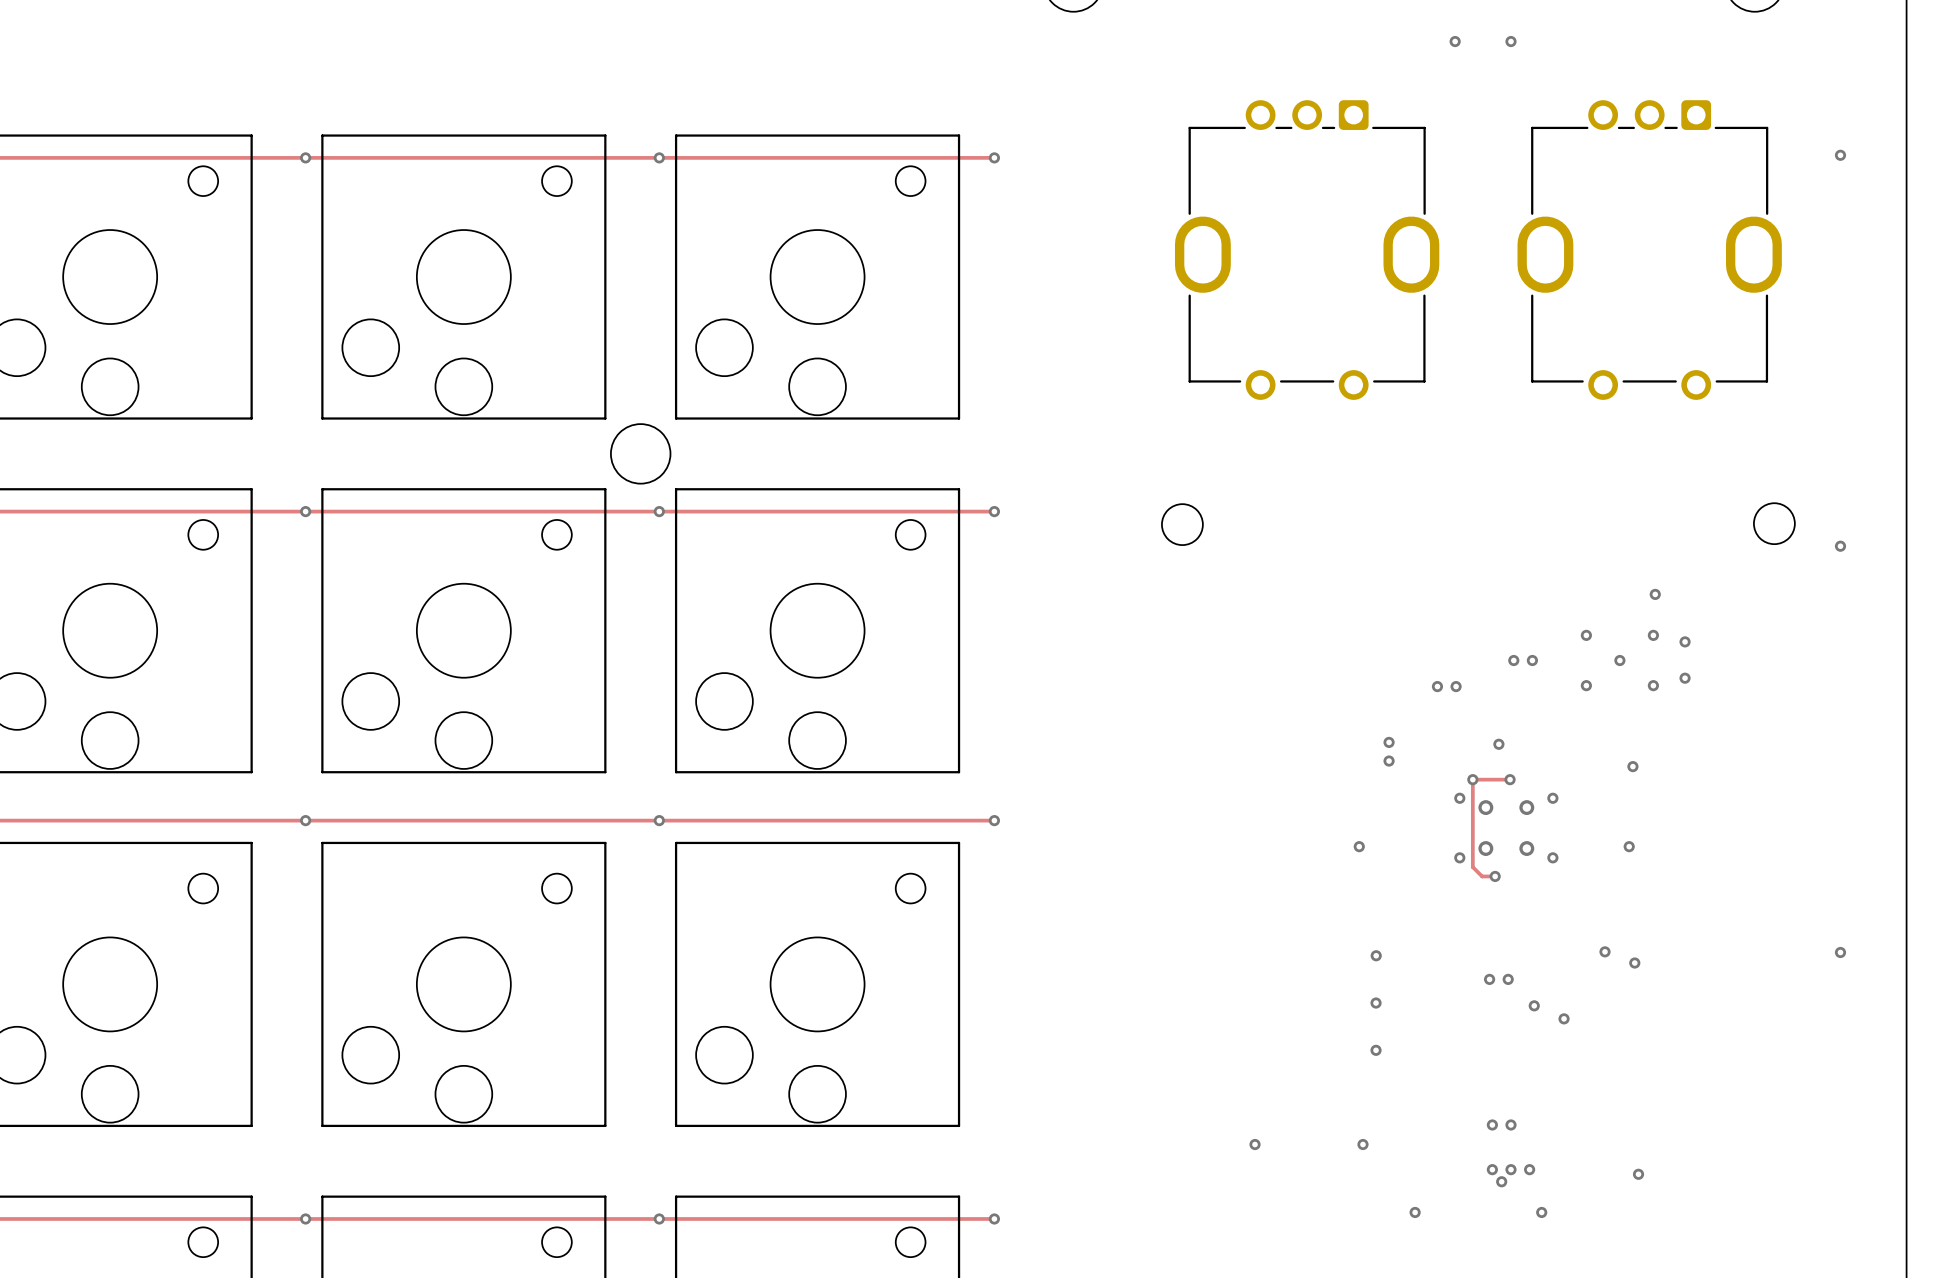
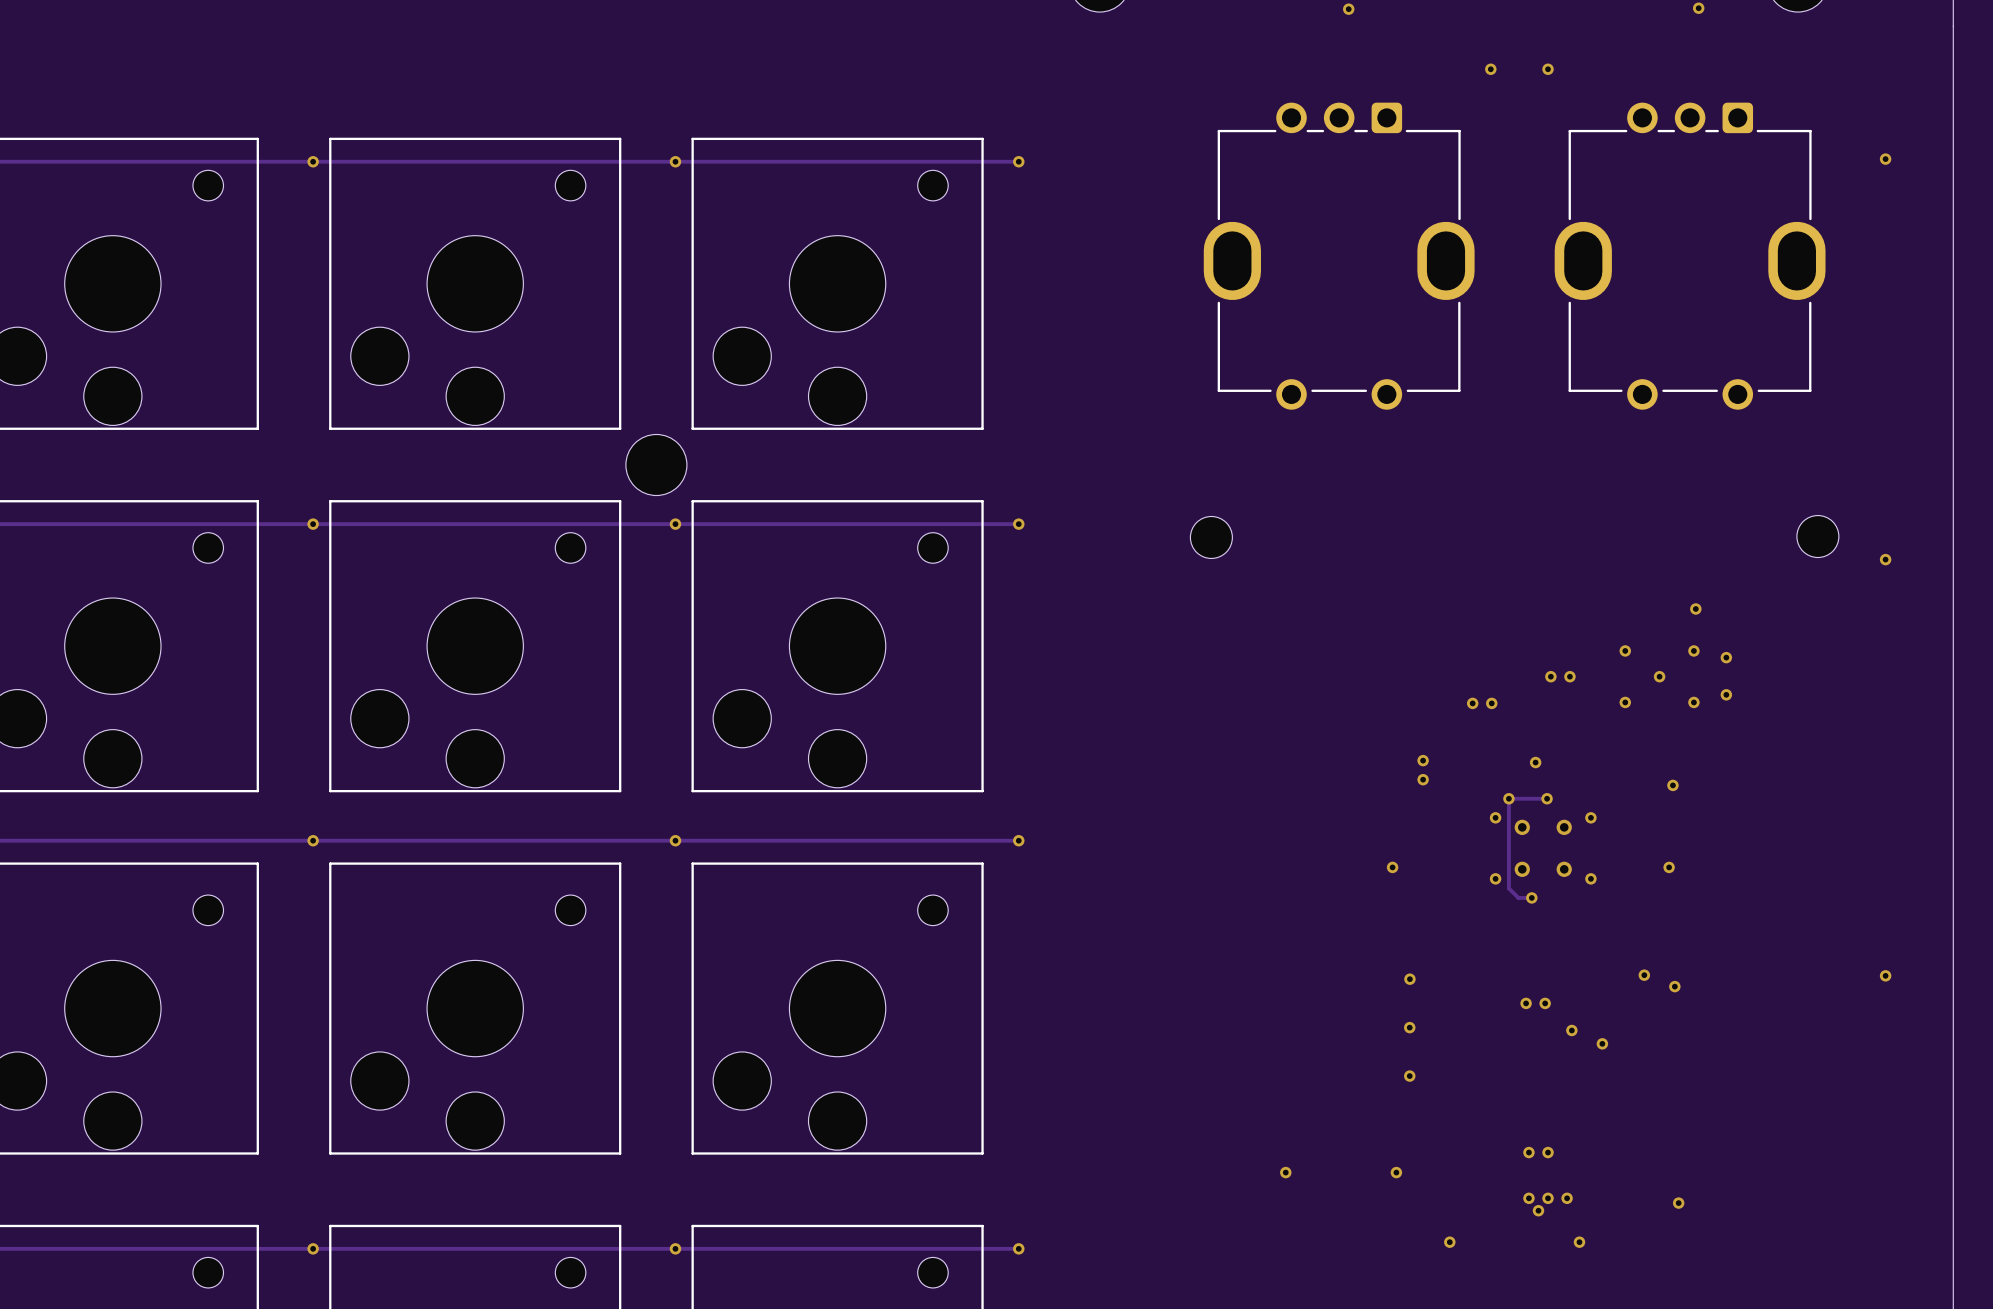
via: none -> (1348, 9)
via: none -> (1698, 8)
via position: (1455, 41) -> (1490, 69)
via position: (1510, 41) -> (1548, 69)

